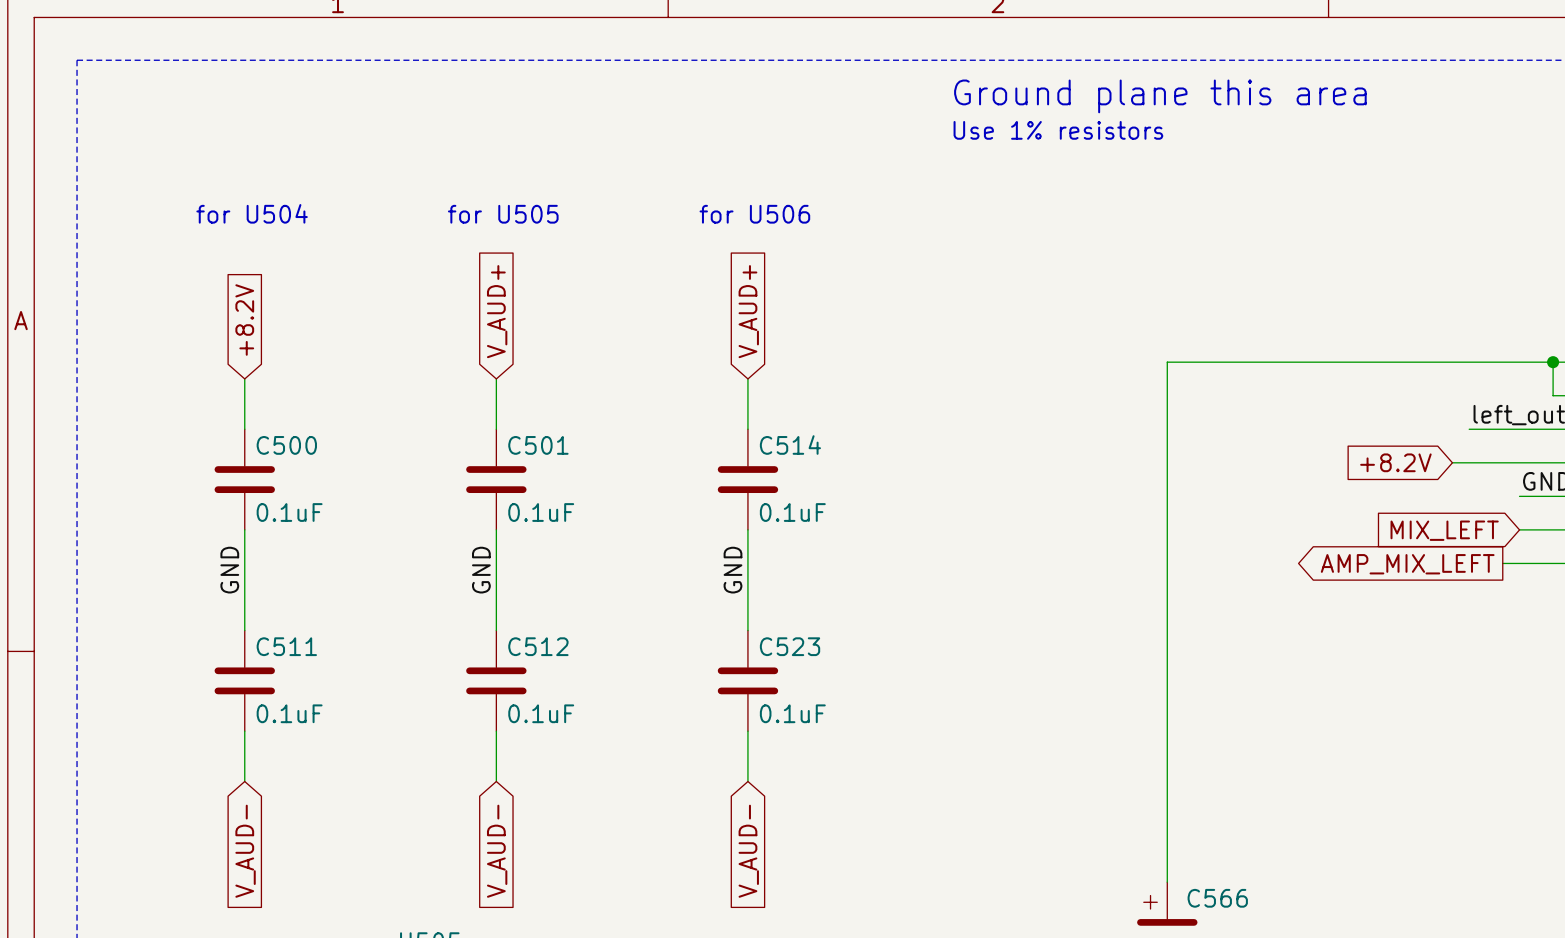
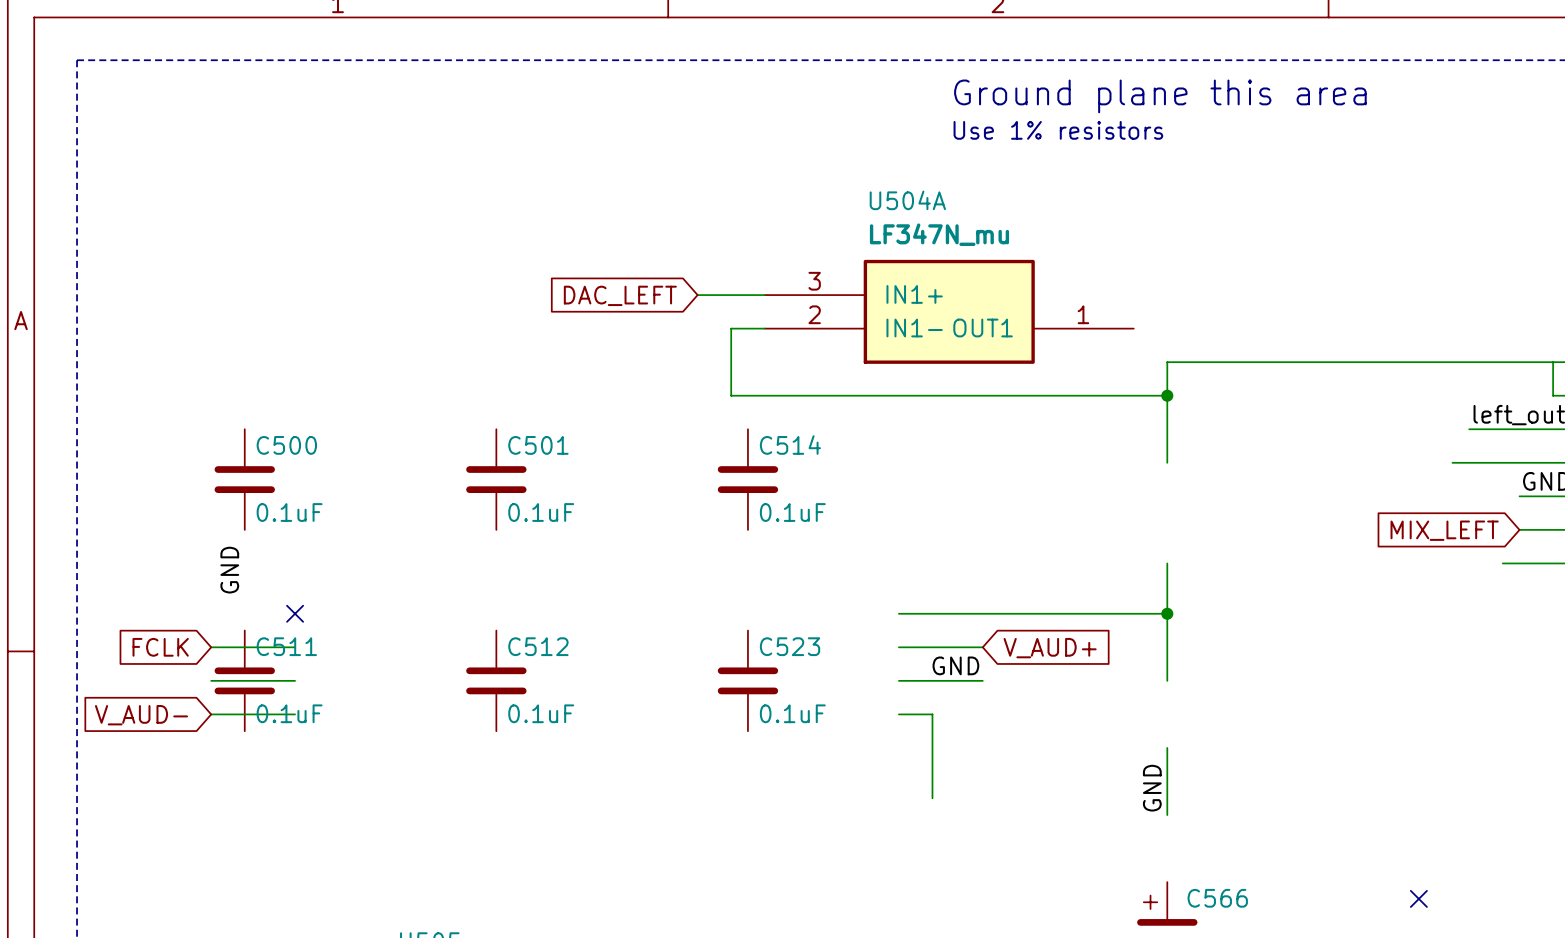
text: for U504 (252, 213) -> none
text: for U505 (503, 214) -> none
text: for U506 (754, 214) -> none
global label: none -> DAC_LEFT (620, 295)
wire: none -> (697, 295) (764, 295)
global label: V_AUD+ (497, 311) -> none
global label: V_AUD+ (748, 311) -> none
U504A: none -> LF347N_mu (949, 311)
global label: +8.2V (244, 320) -> none
wire: none -> (764, 328) (731, 328) (731, 395) (1167, 395)
junction: (1553, 362) -> none
wire: (244, 378) (244, 429) -> none
wire: (496, 378) (496, 429) -> none
wire: (747, 378) (747, 429) -> none
junction: none -> (1167, 395)
wire: (1167, 462) (1167, 563) -> none
global label: +8.2V (1395, 462) -> none
wire: (244, 529) (244, 630) -> none
wire: (496, 529) (496, 630) -> none
wire: (747, 529) (747, 630) -> none
global label: AMP_MIX_LEFT (1407, 564) -> none
label: GND (481, 570) -> none
label: GND (732, 570) -> none
no-connect mark: none -> (295, 613)
wire: none -> (898, 613) (1167, 613)
junction: none -> (1167, 613)
global label: none -> FCLK (160, 647)
wire: none -> (211, 647) (295, 647)
wire: none -> (898, 647) (982, 647)
global label: none -> V_AUD+ (1050, 648)
label: none -> GND (955, 665)
wire: none -> (211, 680) (295, 680)
wire: none -> (898, 680) (982, 680)
wire: (1167, 680) (1167, 747) -> none
wire: none -> (211, 714) (295, 714)
wire: none -> (898, 714) (932, 714) (932, 798)
wire: (244, 731) (244, 781) -> none
wire: (496, 731) (496, 781) -> none
wire: (747, 731) (747, 781) -> none
label: none -> GND (1152, 788)
wire: (1167, 815) (1167, 882) -> none
global label rotation: 0° (245, 851) -> 90° clockwise (141, 715)
global label position: V_AUD- (245, 851) -> V_AUD- (141, 715)
global label: V_AUD- (497, 851) -> none
global label: V_AUD- (748, 851) -> none
no-connect mark: none -> (1418, 898)

